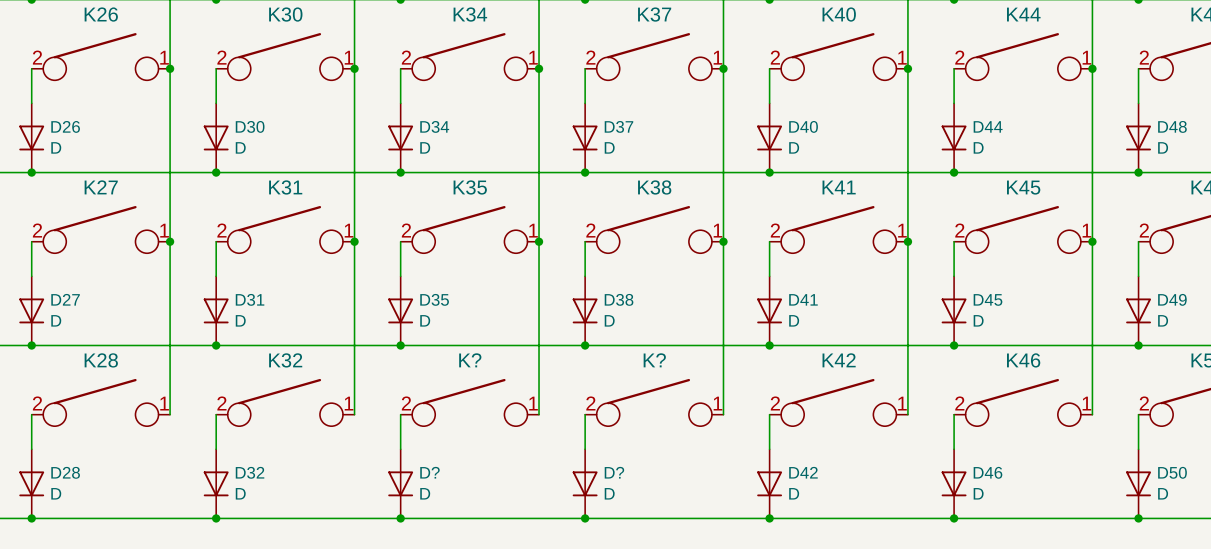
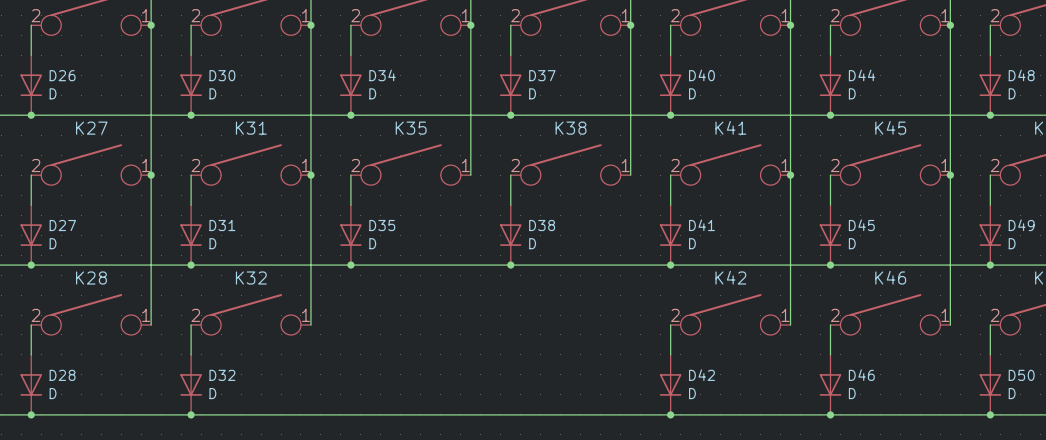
wire: (539, 241) (539, 414) -> none
junction: (539, 241) -> none
wire: (723, 241) (723, 414) -> none
junction: (723, 241) -> none
K?: (469, 402) -> none
K?: (654, 402) -> none
wire: (400, 414) (400, 449) -> none
wire: (585, 414) (585, 449) -> none
D?: D (400, 483) -> none
D?: D (585, 483) -> none
junction: (400, 518) -> none
junction: (585, 518) -> none

